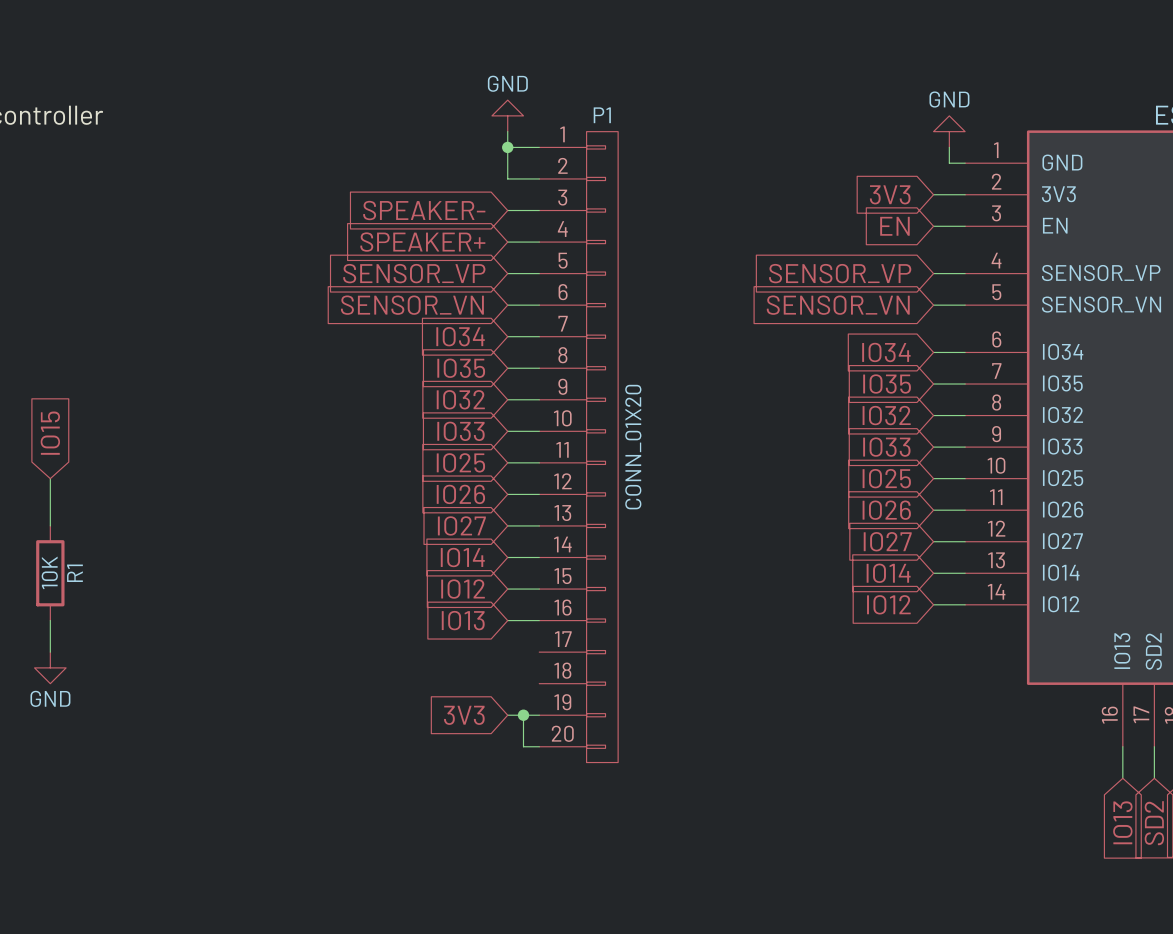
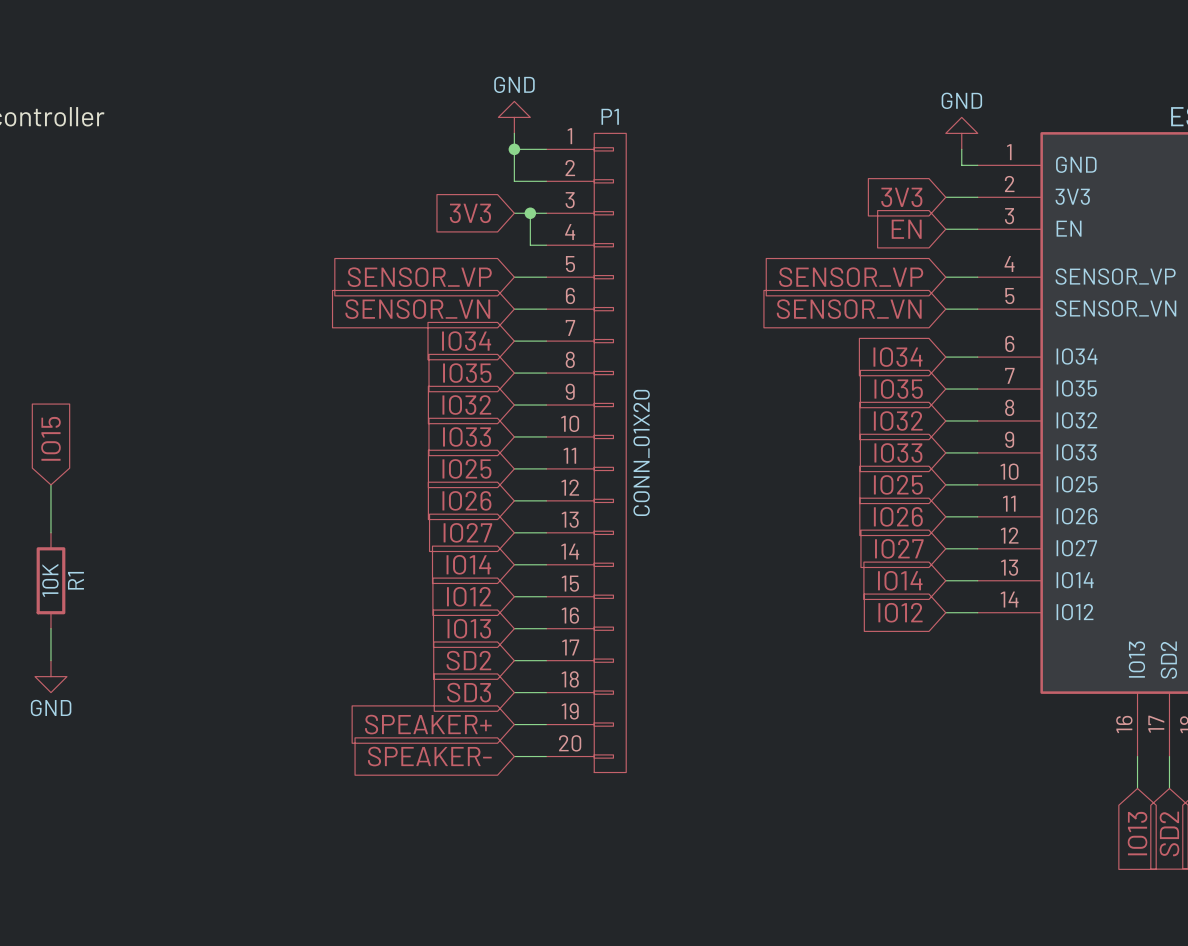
global label: SPEAKER- (424, 210) -> 3V3 (470, 213)
junction: none -> (530, 213)
global label: SPEAKER+ (422, 242) -> none
wire: (507, 242) (523, 242) -> (530, 213) (530, 245)
global label: none -> SD2 (468, 660)
wire: none -> (514, 660) (546, 660)
global label: none -> SD3 (469, 692)
wire: none -> (514, 692) (546, 692)
global label: 3V3 (464, 715) -> SPEAKER+ (428, 724)
wire: (523, 715) (523, 746) -> (514, 756) (530, 756)
junction: (523, 715) -> none
global label: none -> SPEAKER- (429, 756)

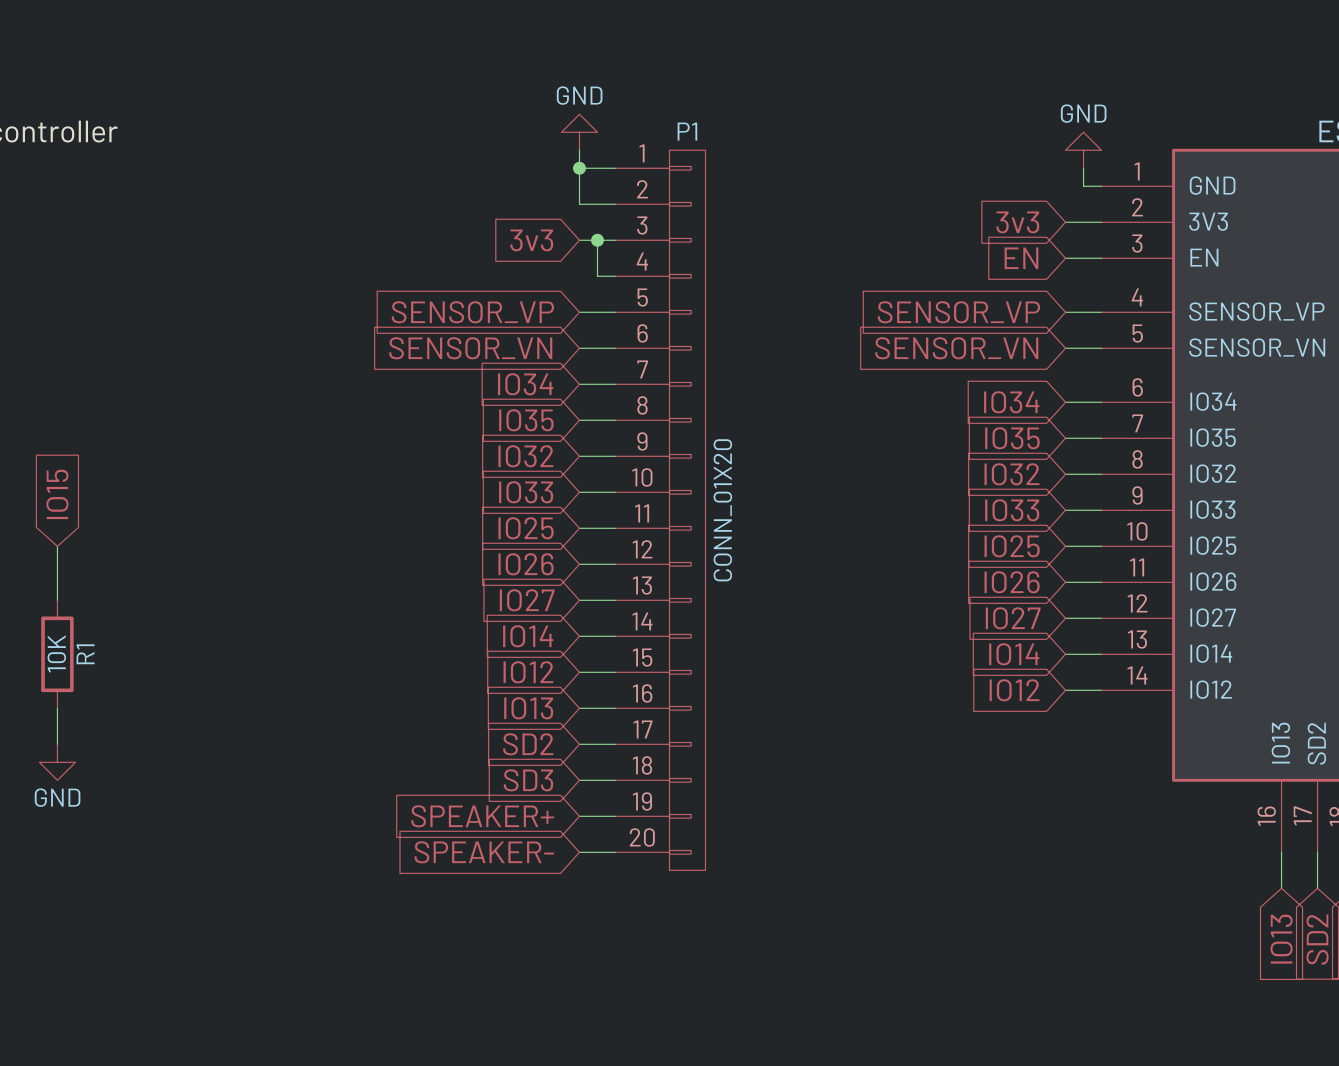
global label: 3V3 (901, 197) -> 3v3 (1017, 222)
global label: 3V3 (470, 213) -> 3v3 (531, 240)

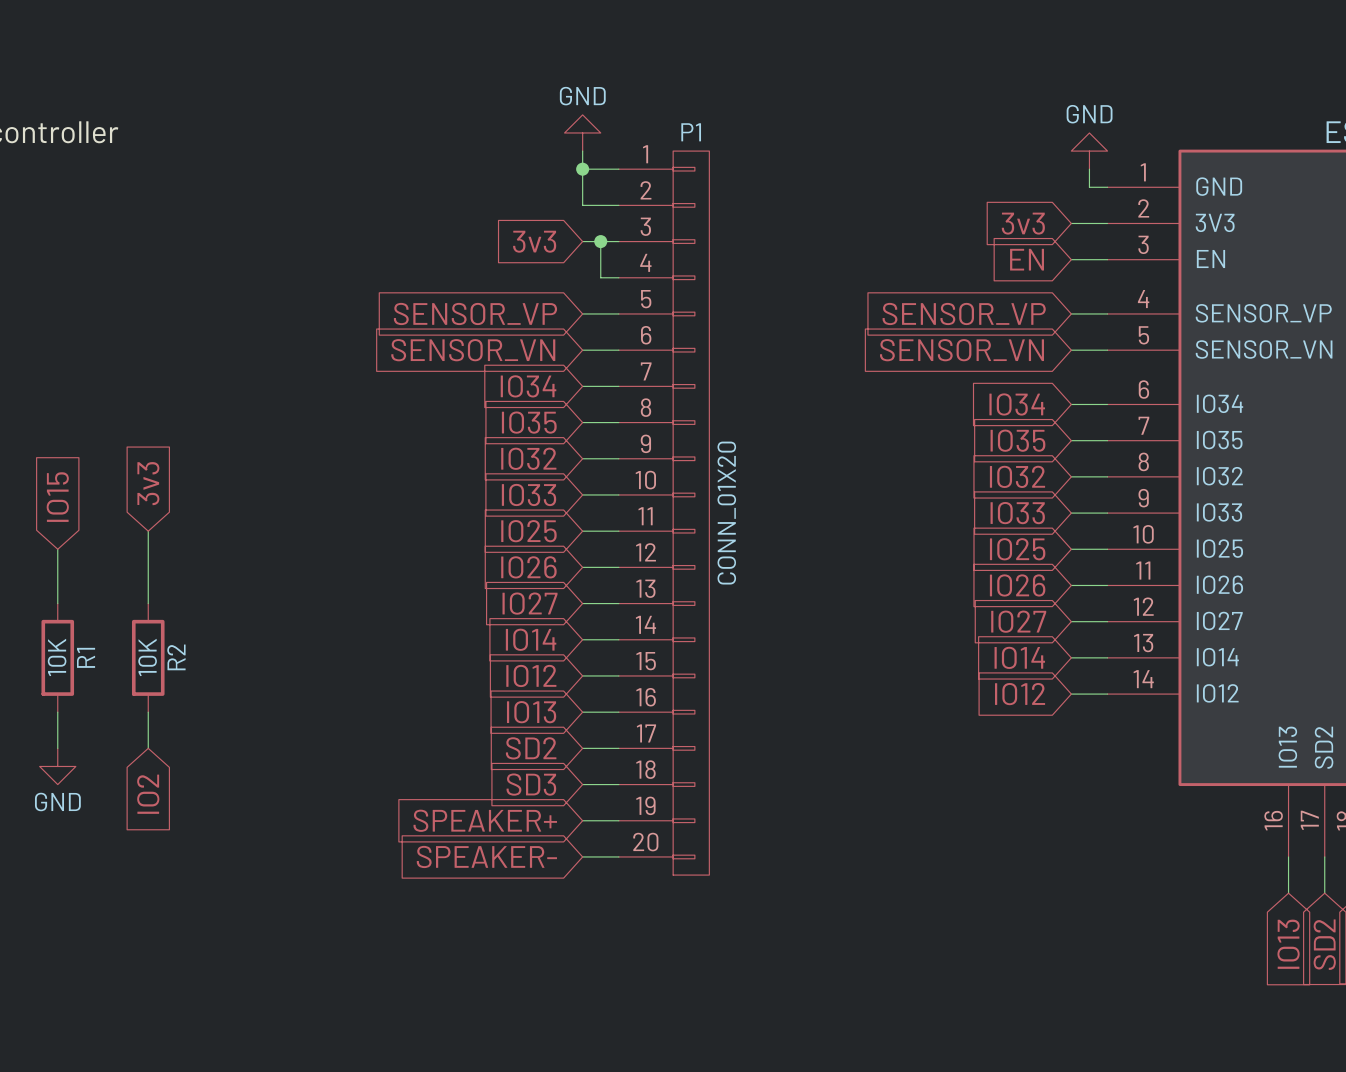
global label: none -> 3v3 (148, 483)
wire: none -> (148, 531) (148, 603)
R2: none -> 10K (148, 657)
wire: none -> (148, 712) (148, 748)
global label: none -> IO2 (148, 794)

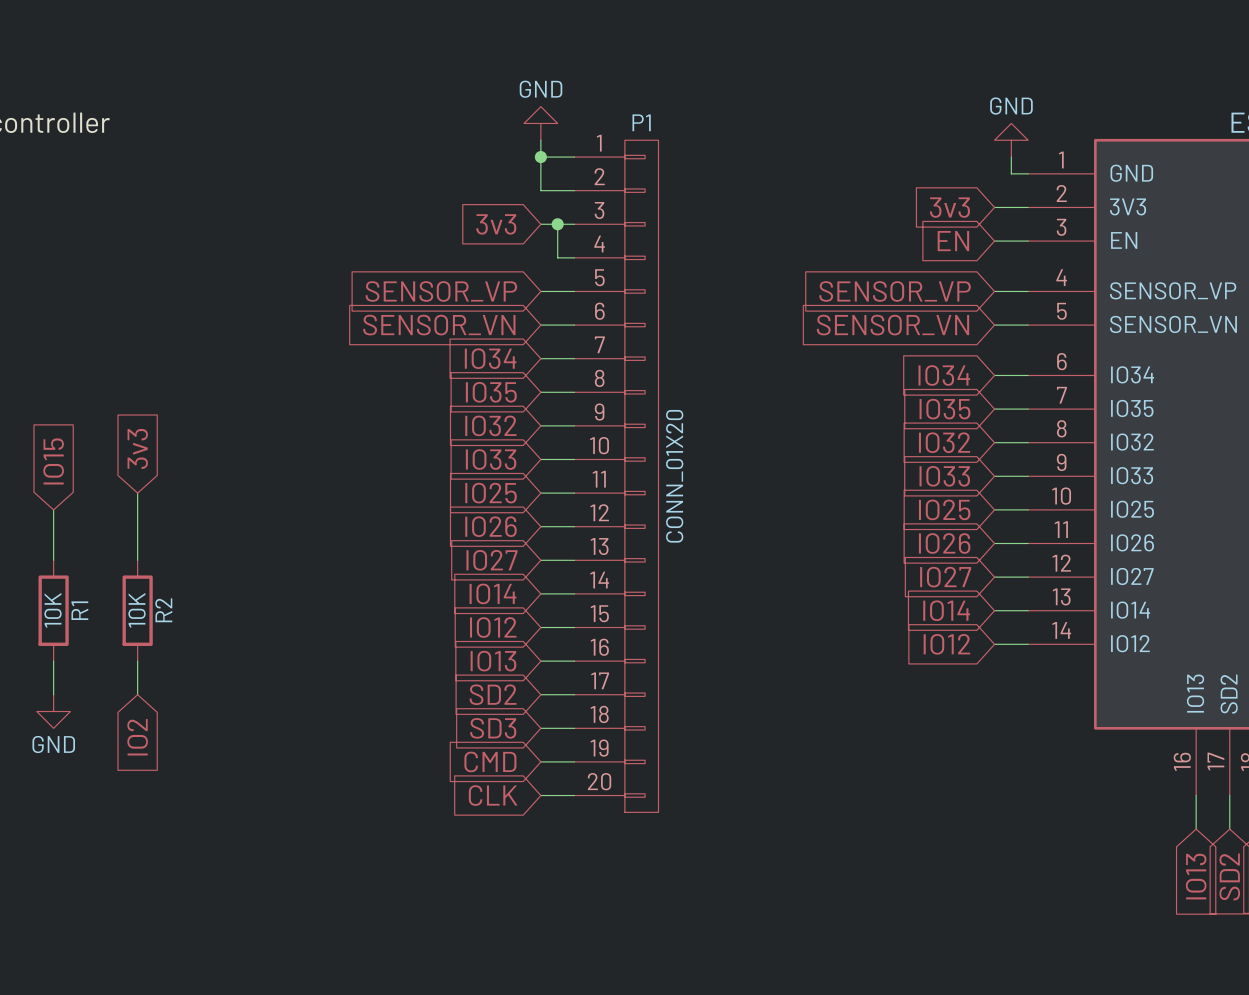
global label: SPEAKER+ (485, 820) -> CMD (490, 761)
global label: SPEAKER- (486, 856) -> CLK (493, 795)

